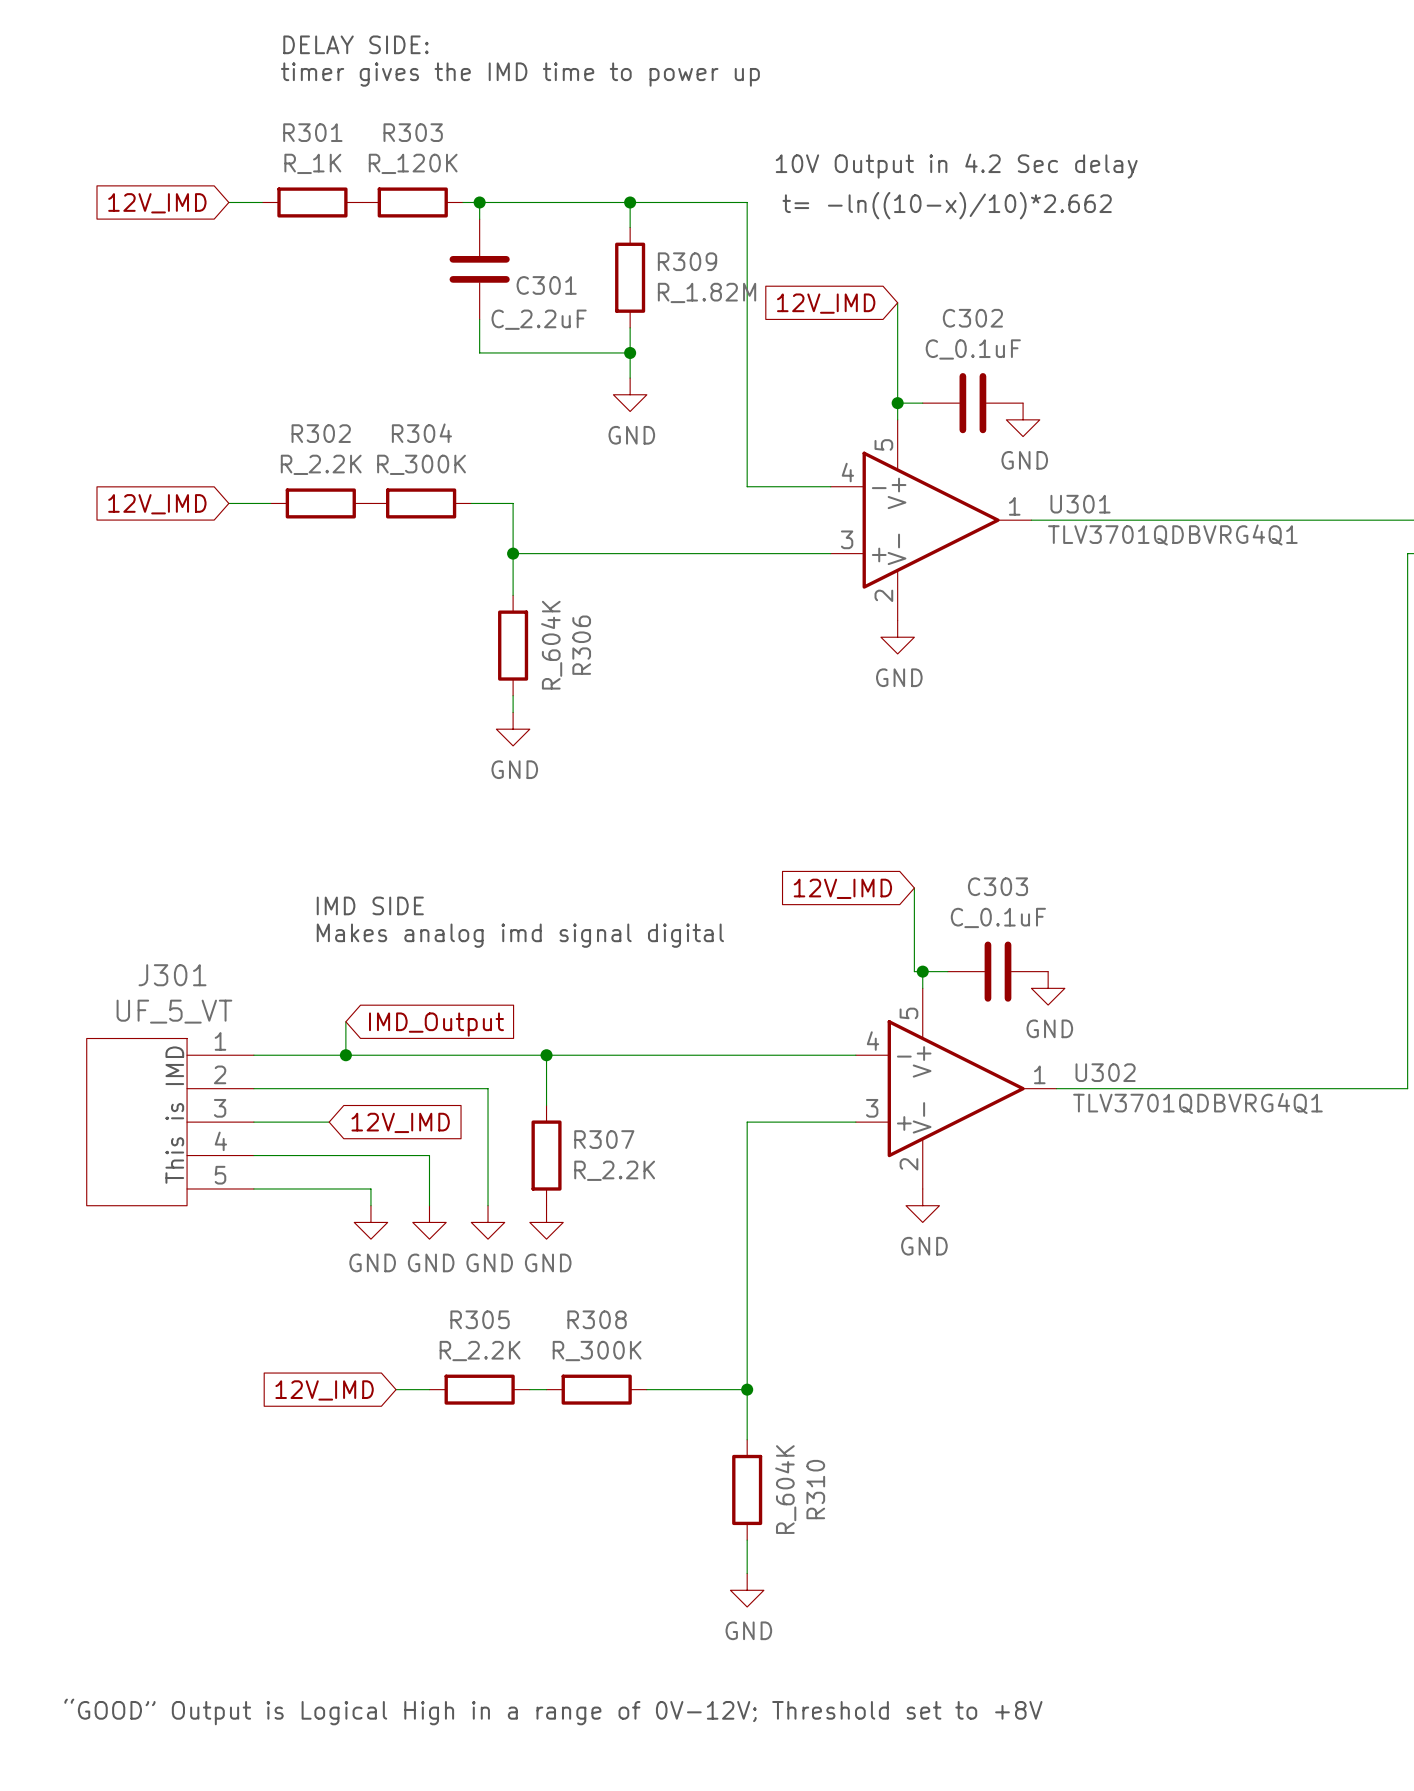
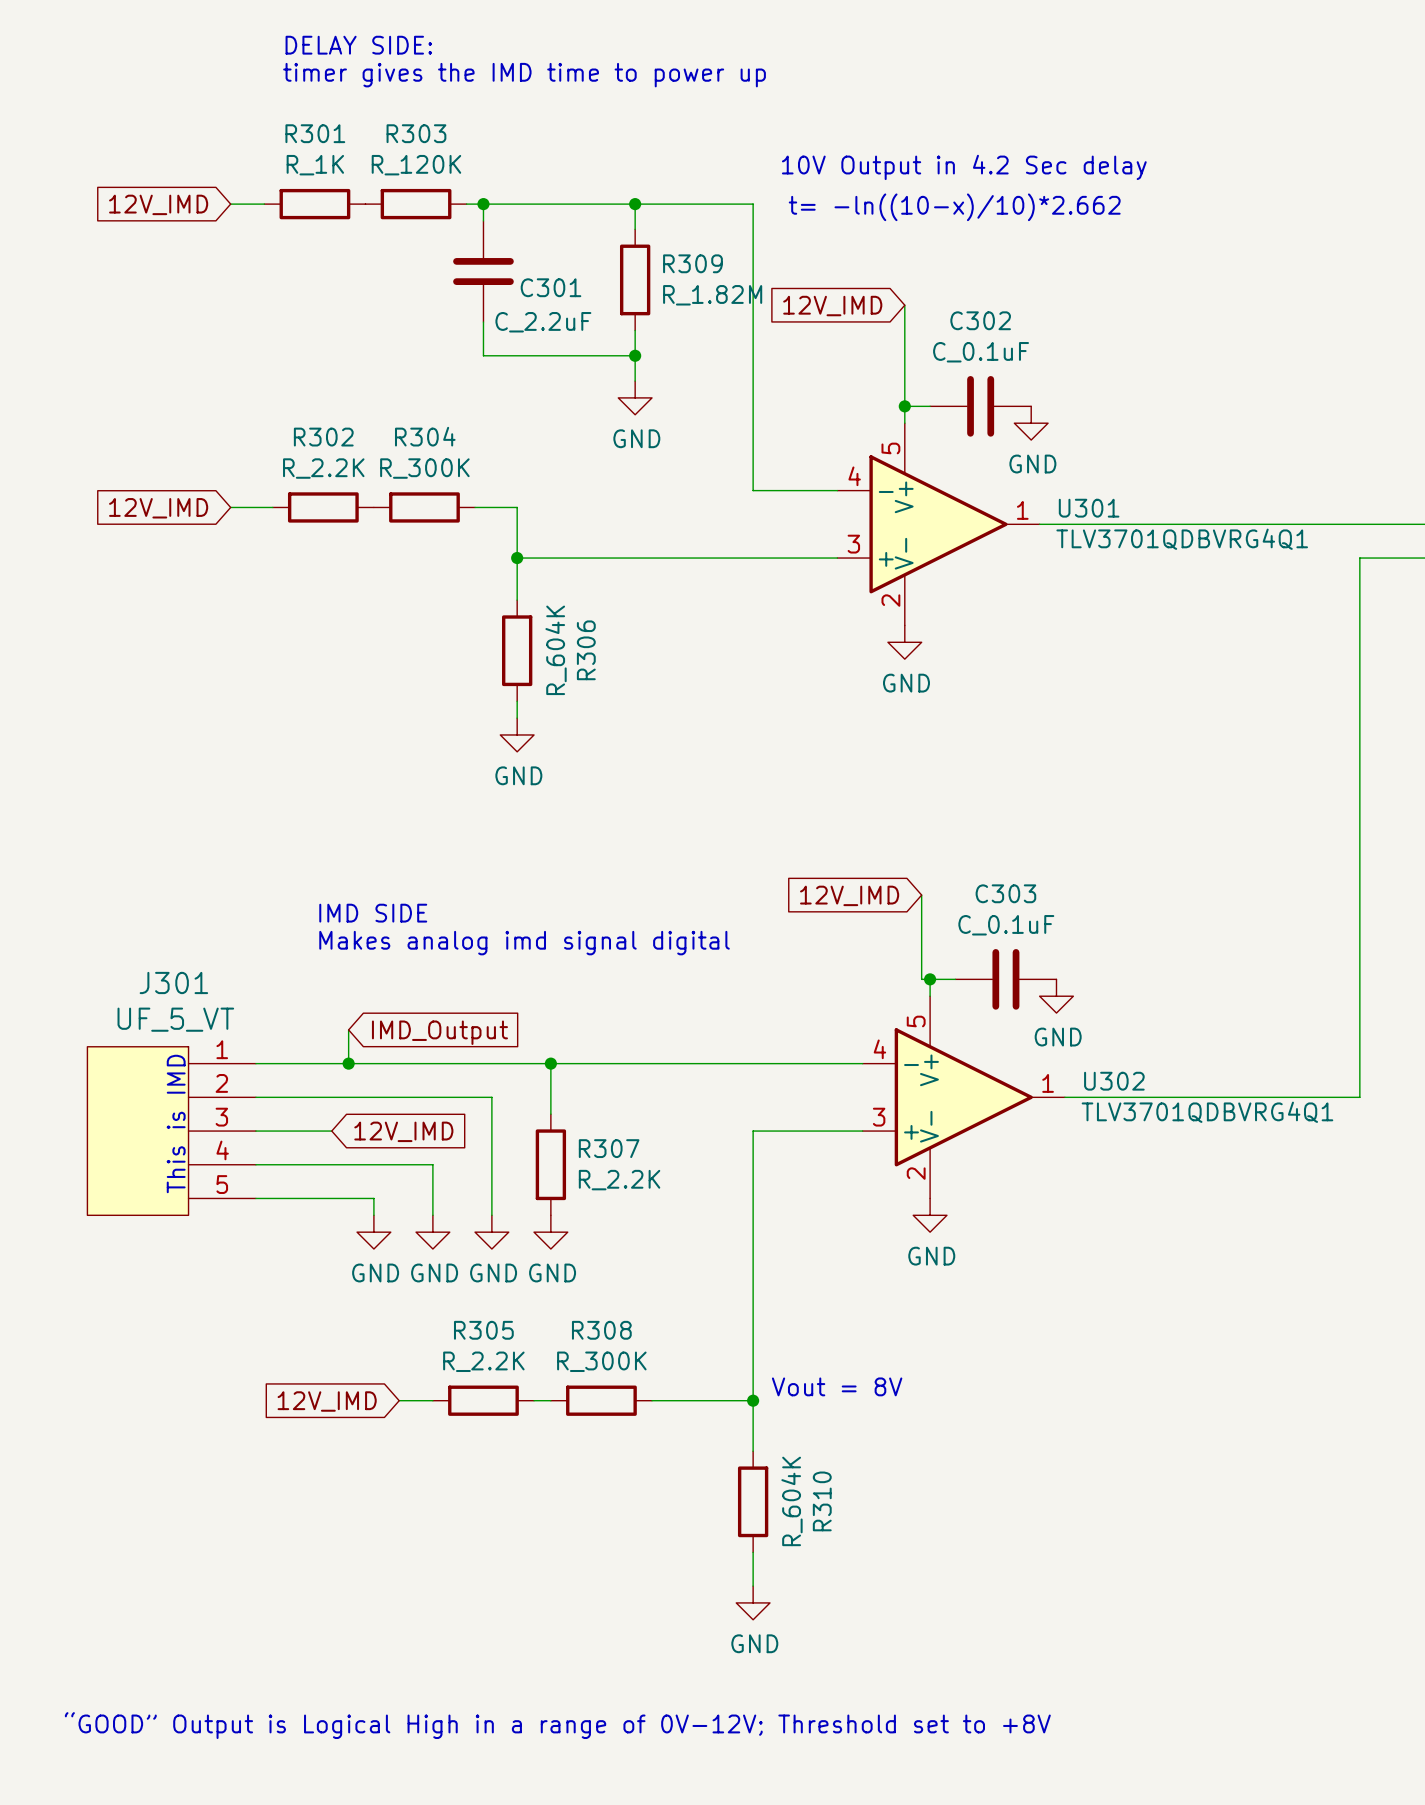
wire: (1407, 553) (1407, 1088) (1349, 1088) -> (1418, 558) (1359, 558) (1359, 1097)
text: none -> Vout = 8V (837, 1386)

